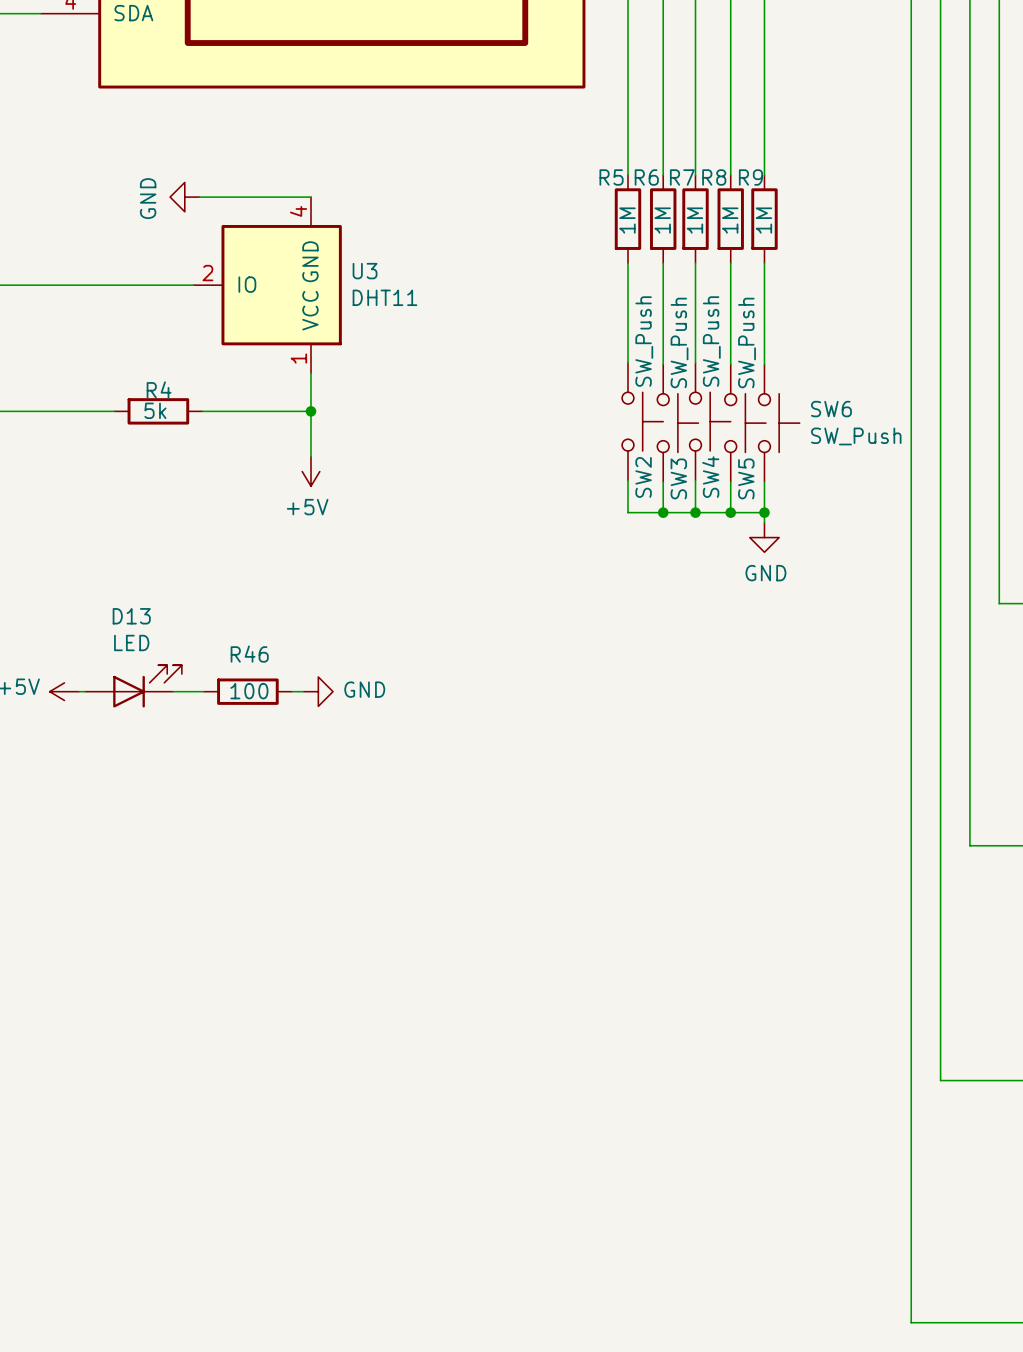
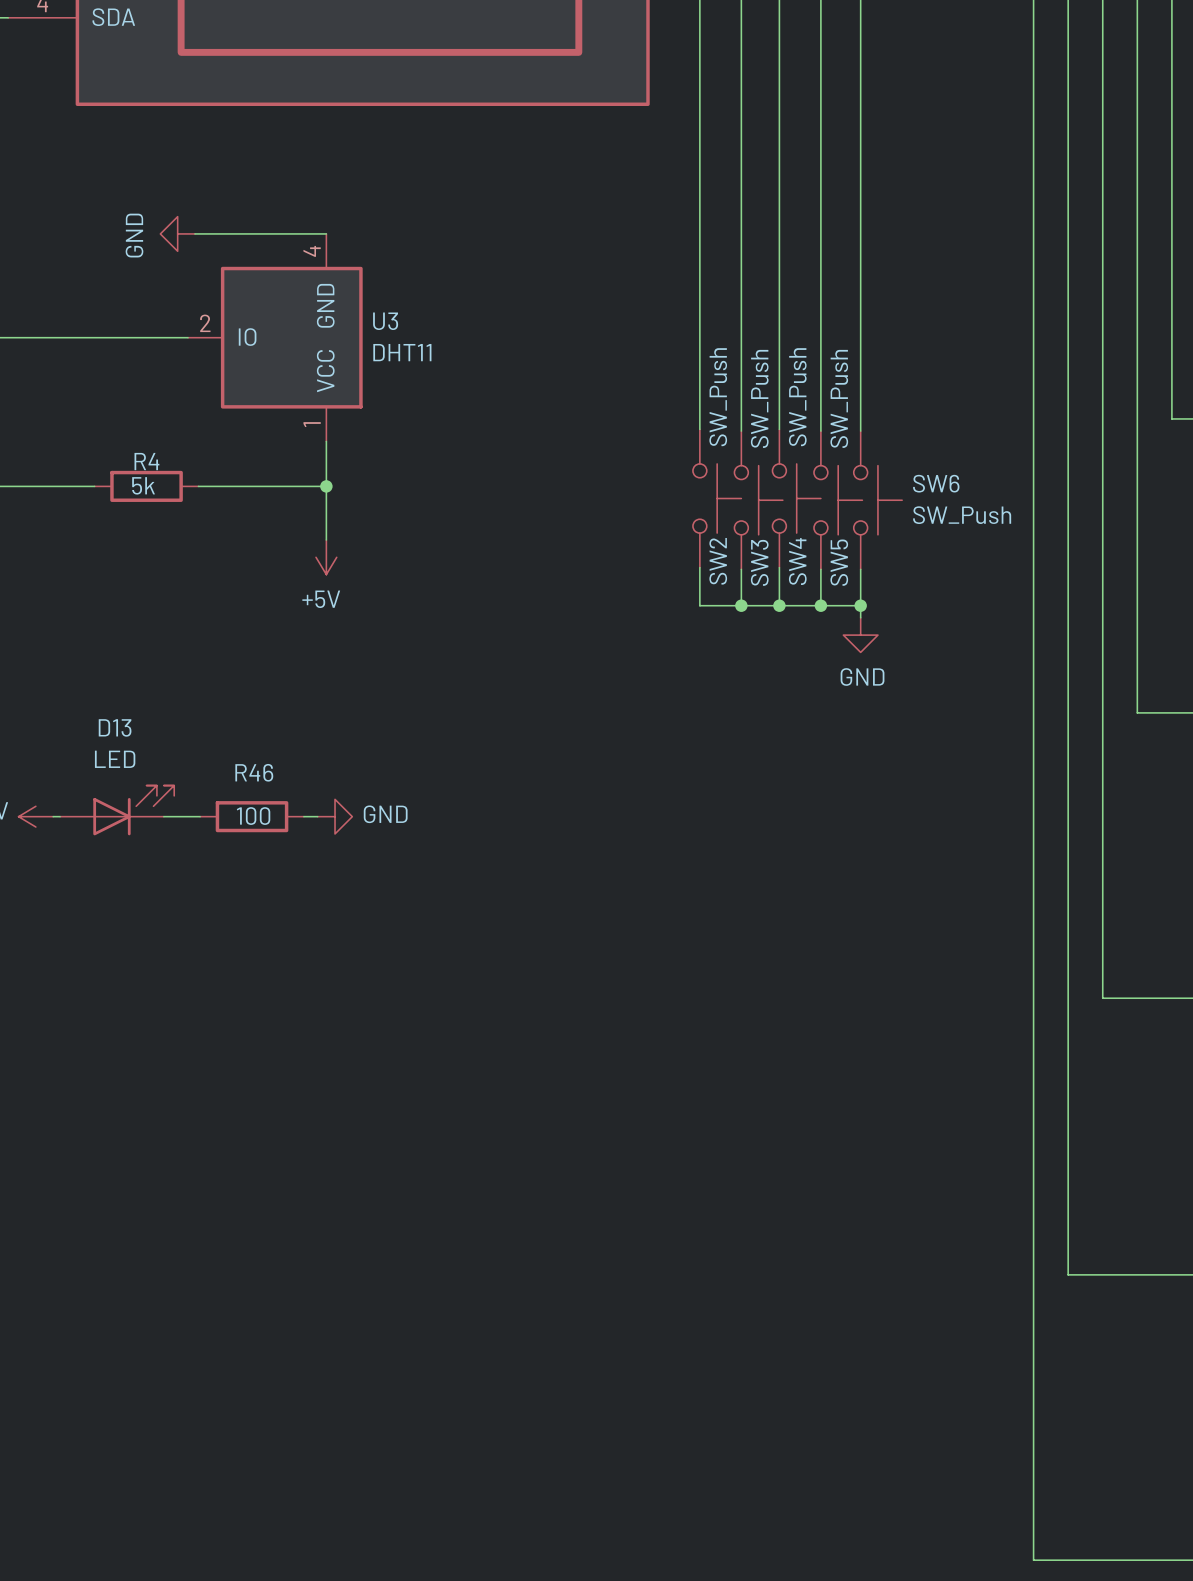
wire: none -> (699, 208) (699, 311)
wire: none -> (741, 208) (741, 311)
wire: none -> (779, 208) (779, 311)
wire: none -> (820, 208) (820, 311)
wire: none -> (860, 208) (860, 311)
R5: 1M (627, 219) -> none
R6: 1M (663, 219) -> none
R7: 1M (695, 219) -> none
R8: 1M (730, 219) -> none
R9: 1M (764, 219) -> none

